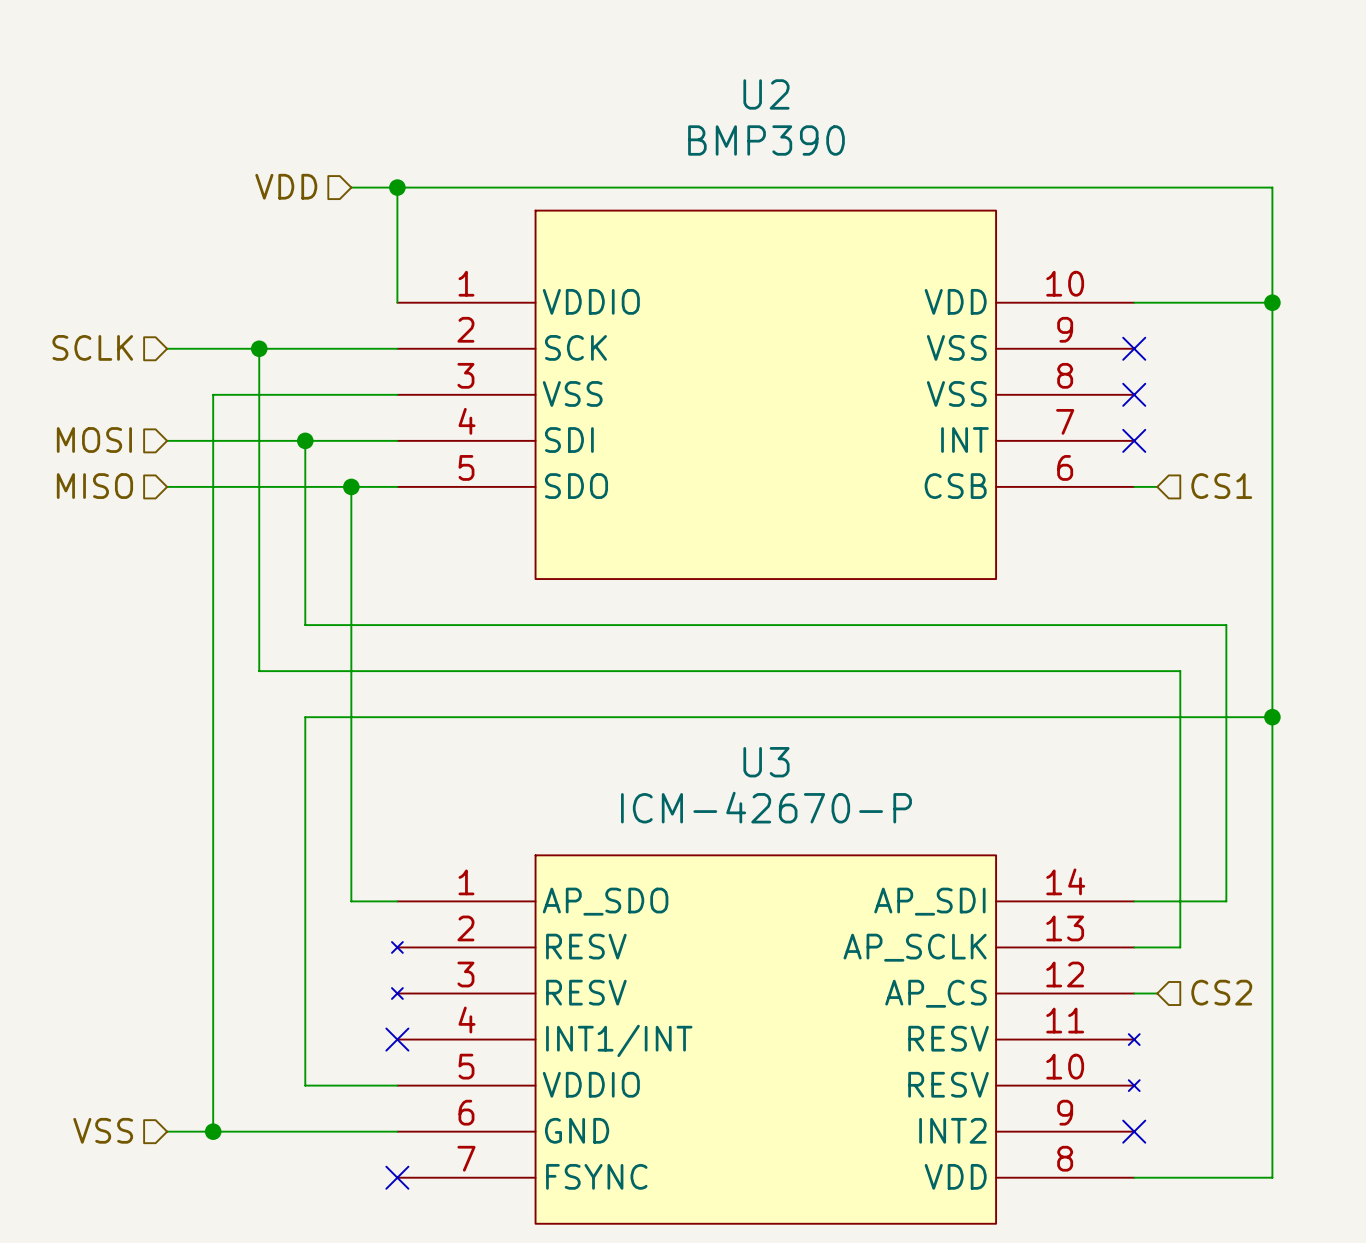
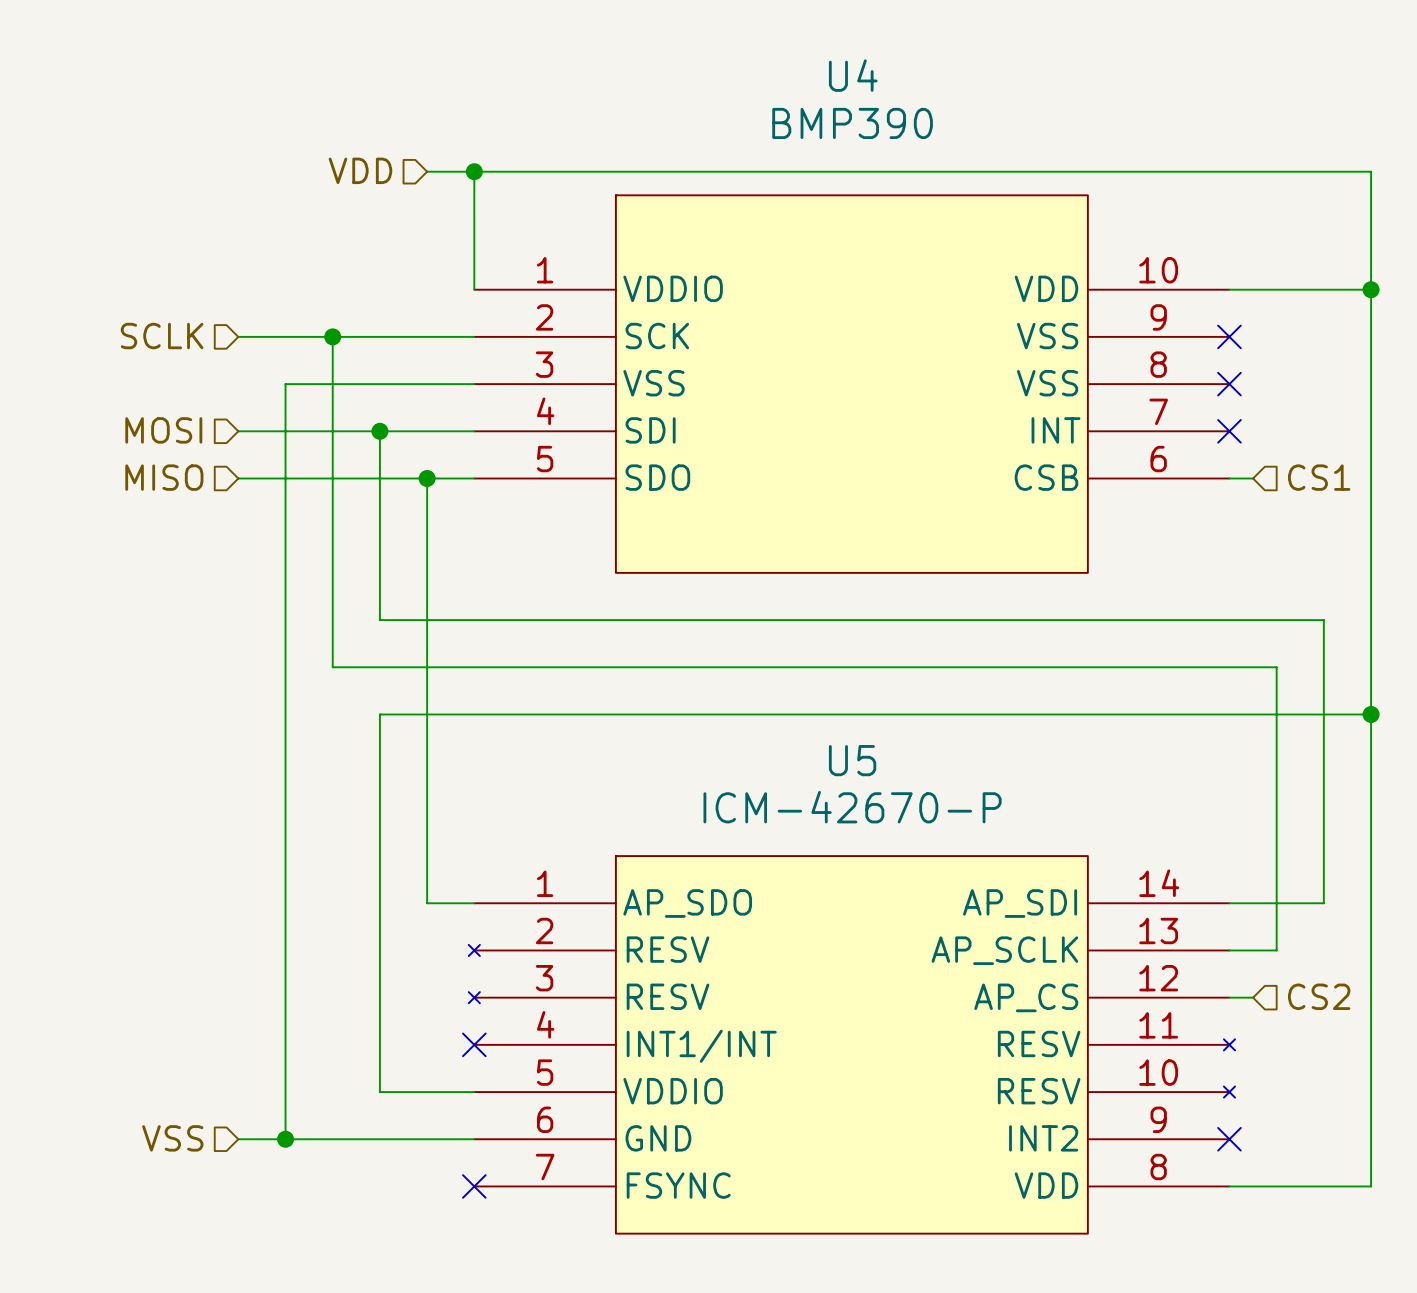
U2 name: U2 (766, 94) -> U4 (853, 75)
U3 name: U3 (766, 762) -> U5 (852, 760)

